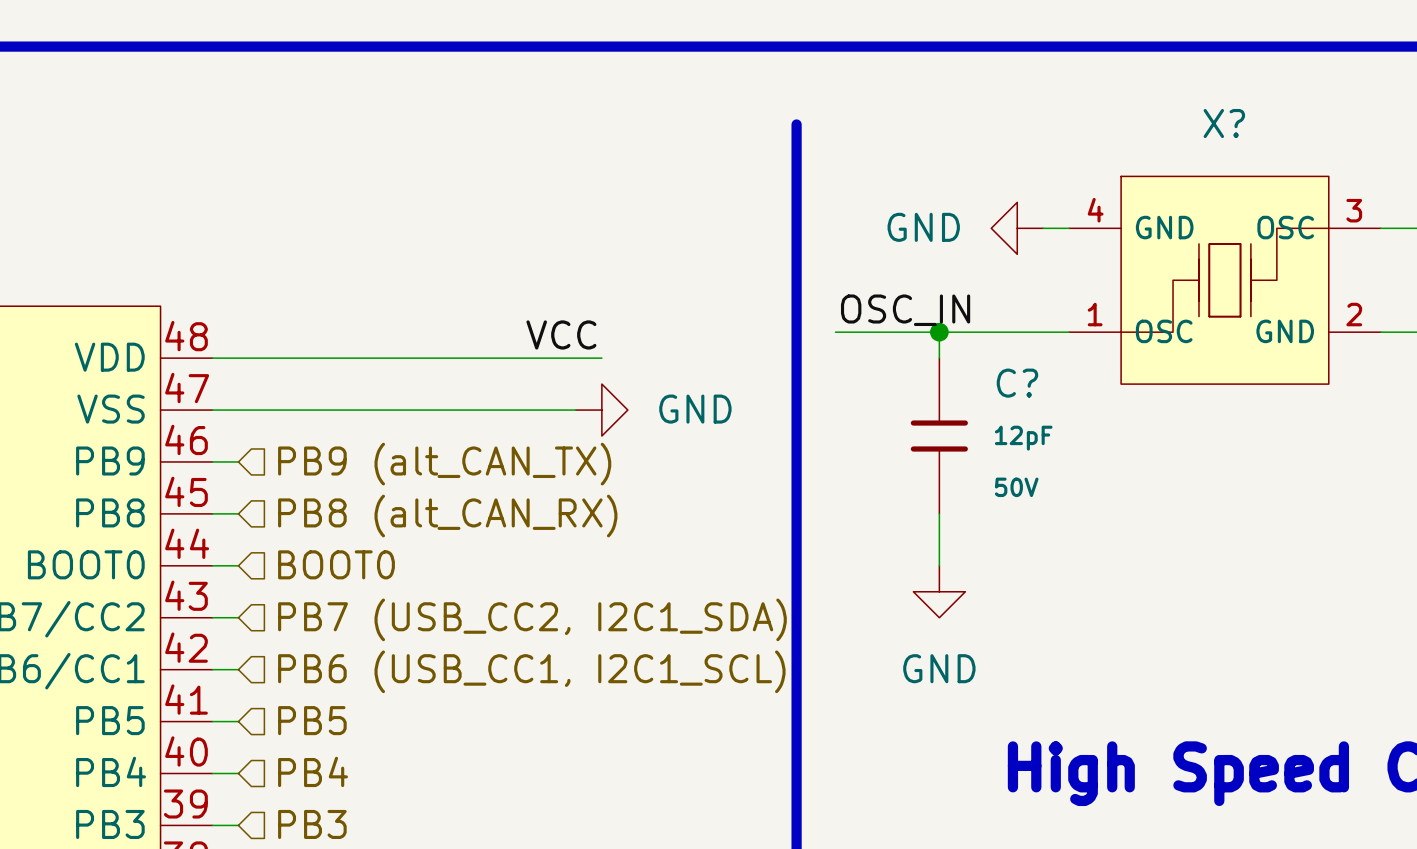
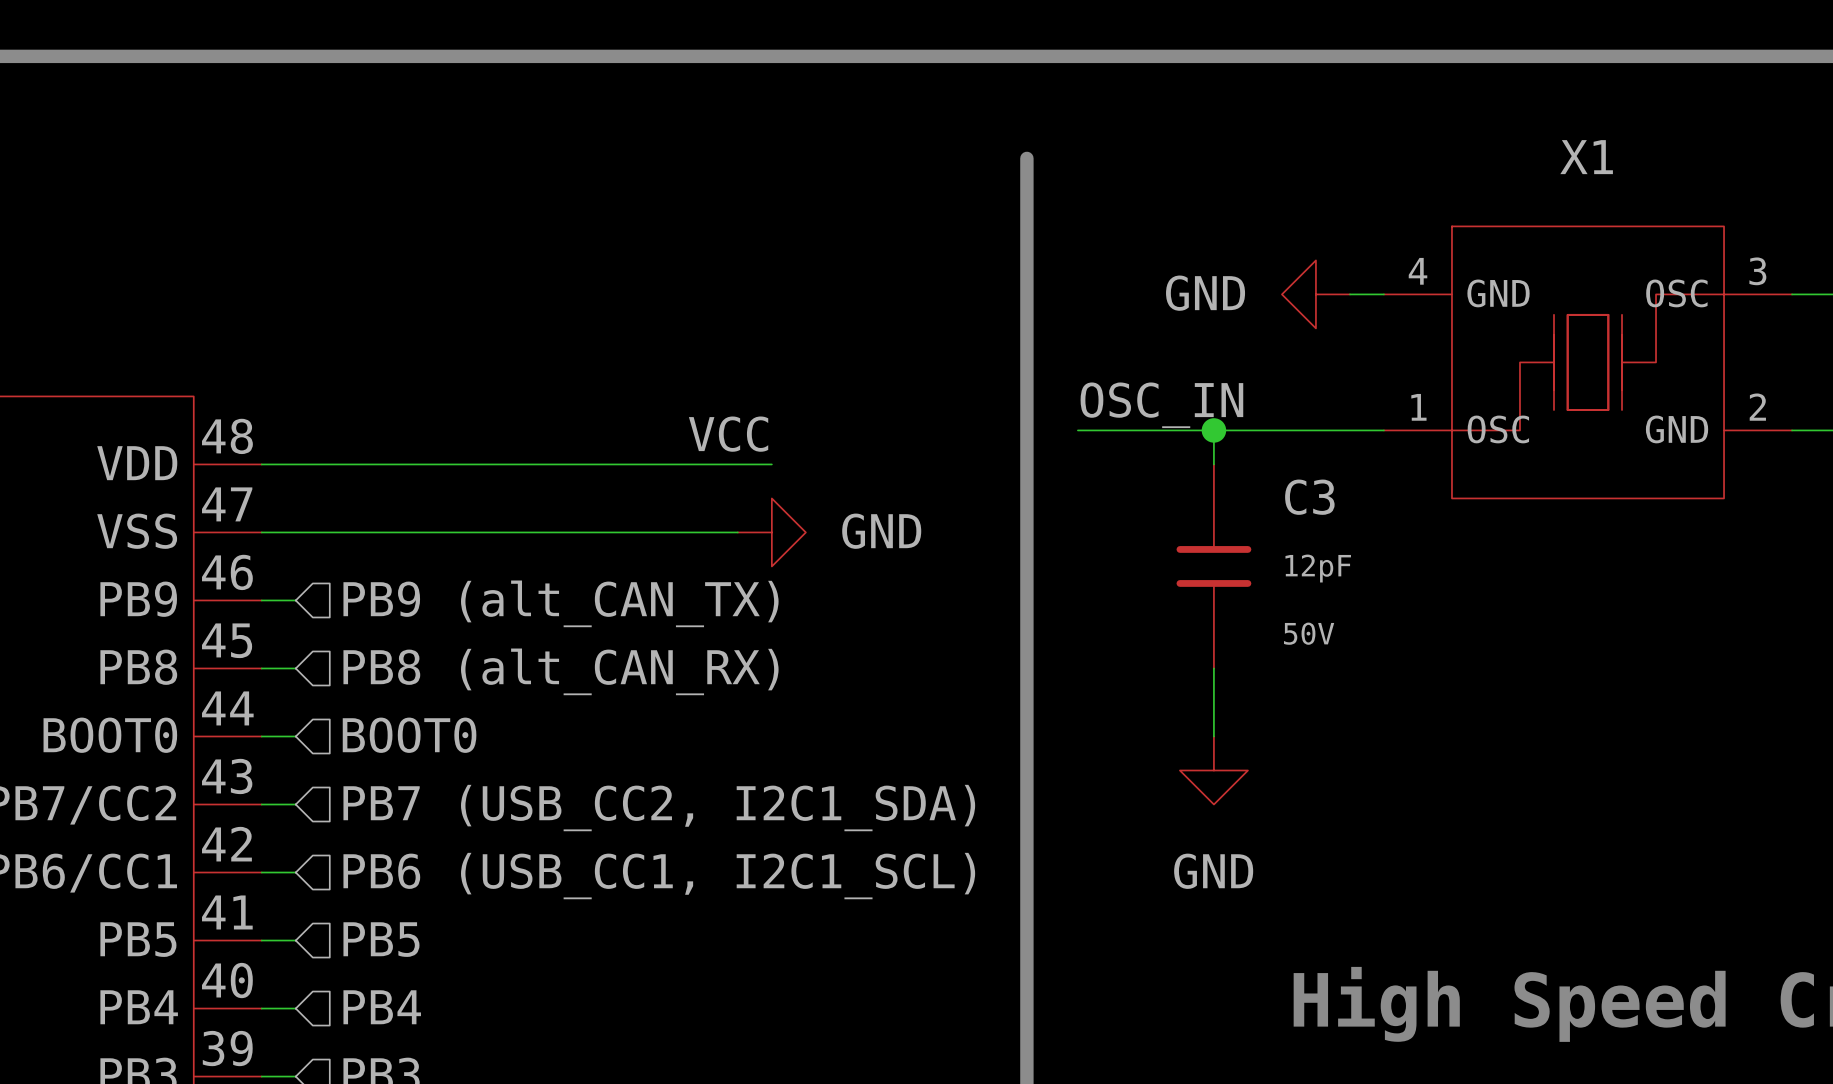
X? name: X? (1224, 123) -> X1 (1586, 157)
C? name: C? (1017, 383) -> C3 (1309, 497)

